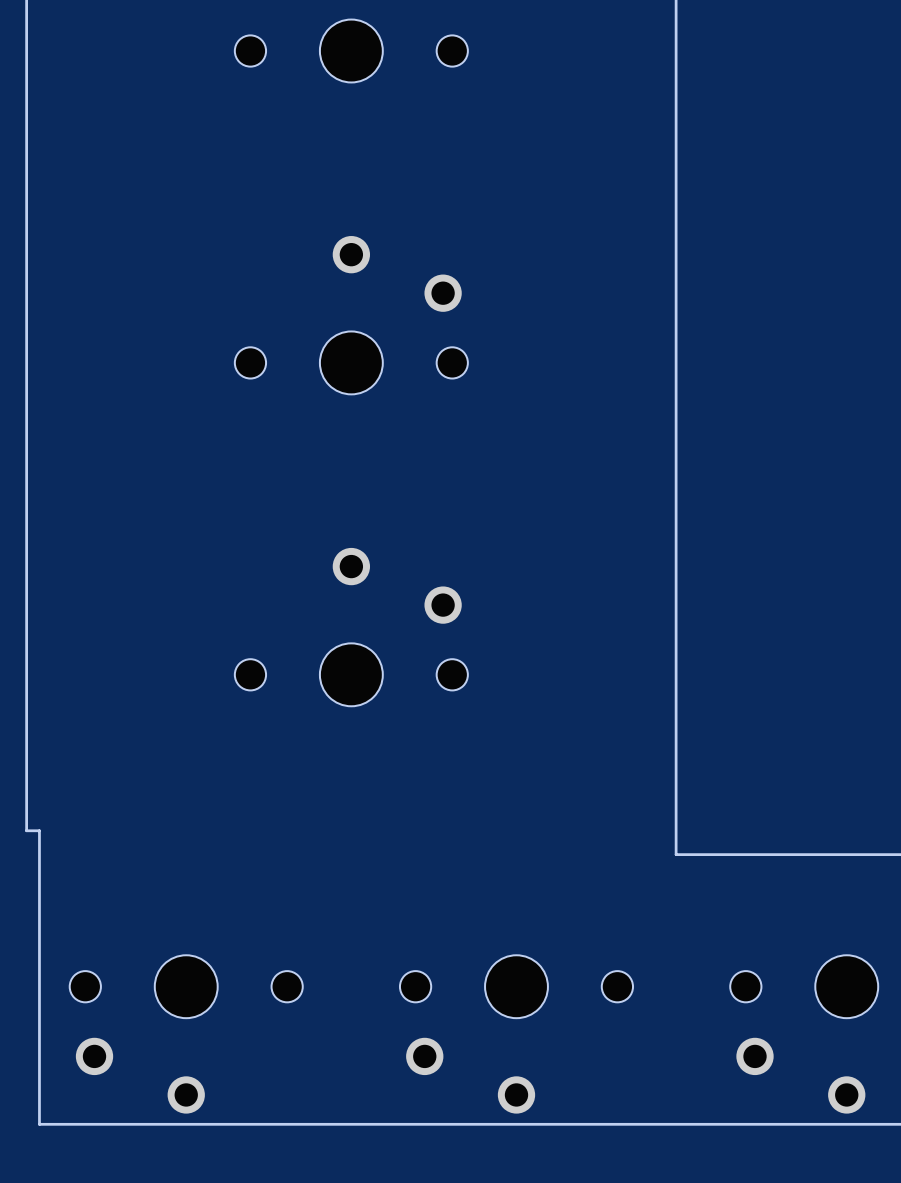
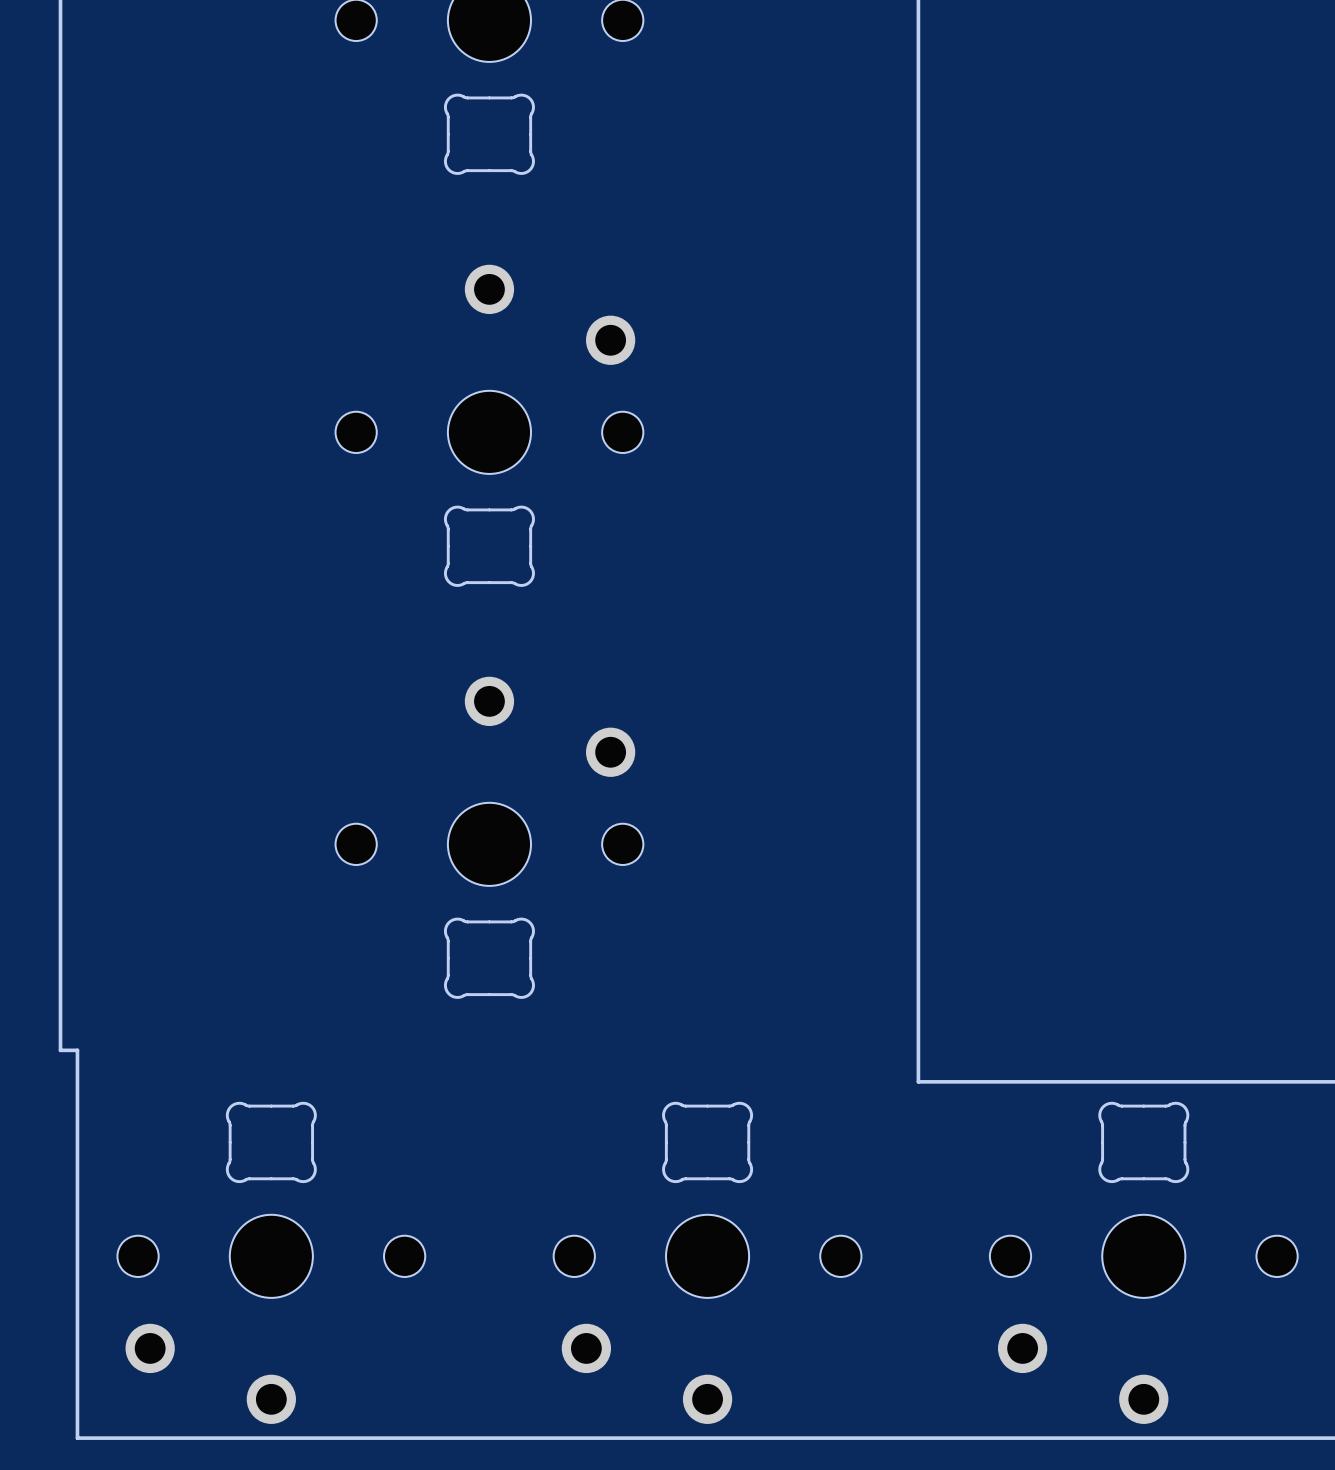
part: none -> (489, 134)
part: none -> (489, 546)
part: none -> (489, 958)
part: none -> (271, 1142)
part: none -> (707, 1142)
part: none -> (1143, 1142)

